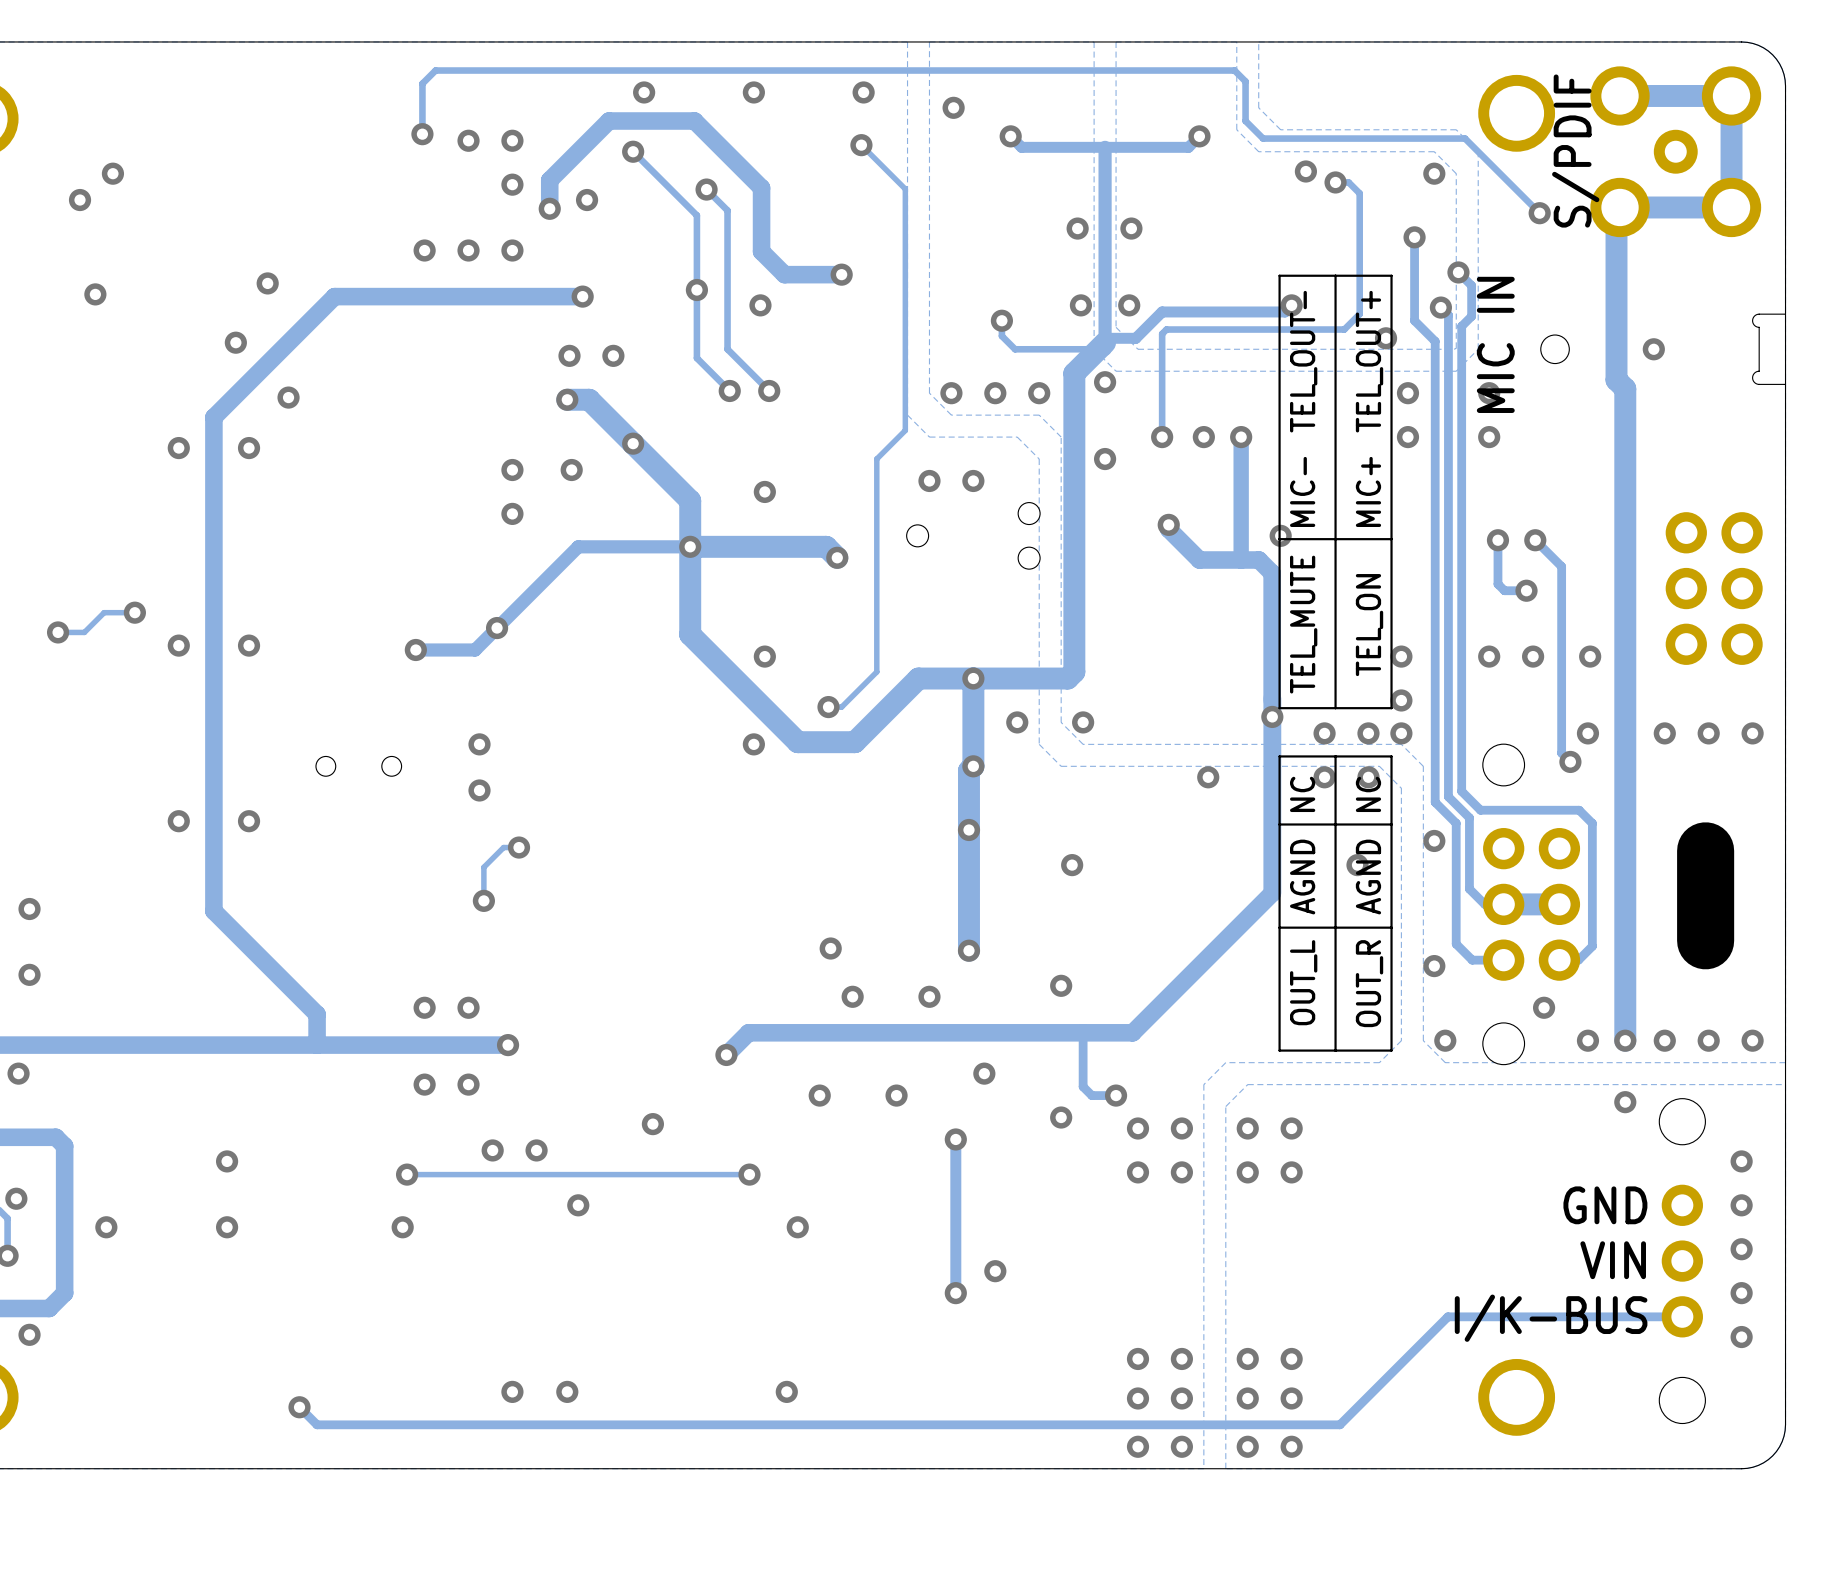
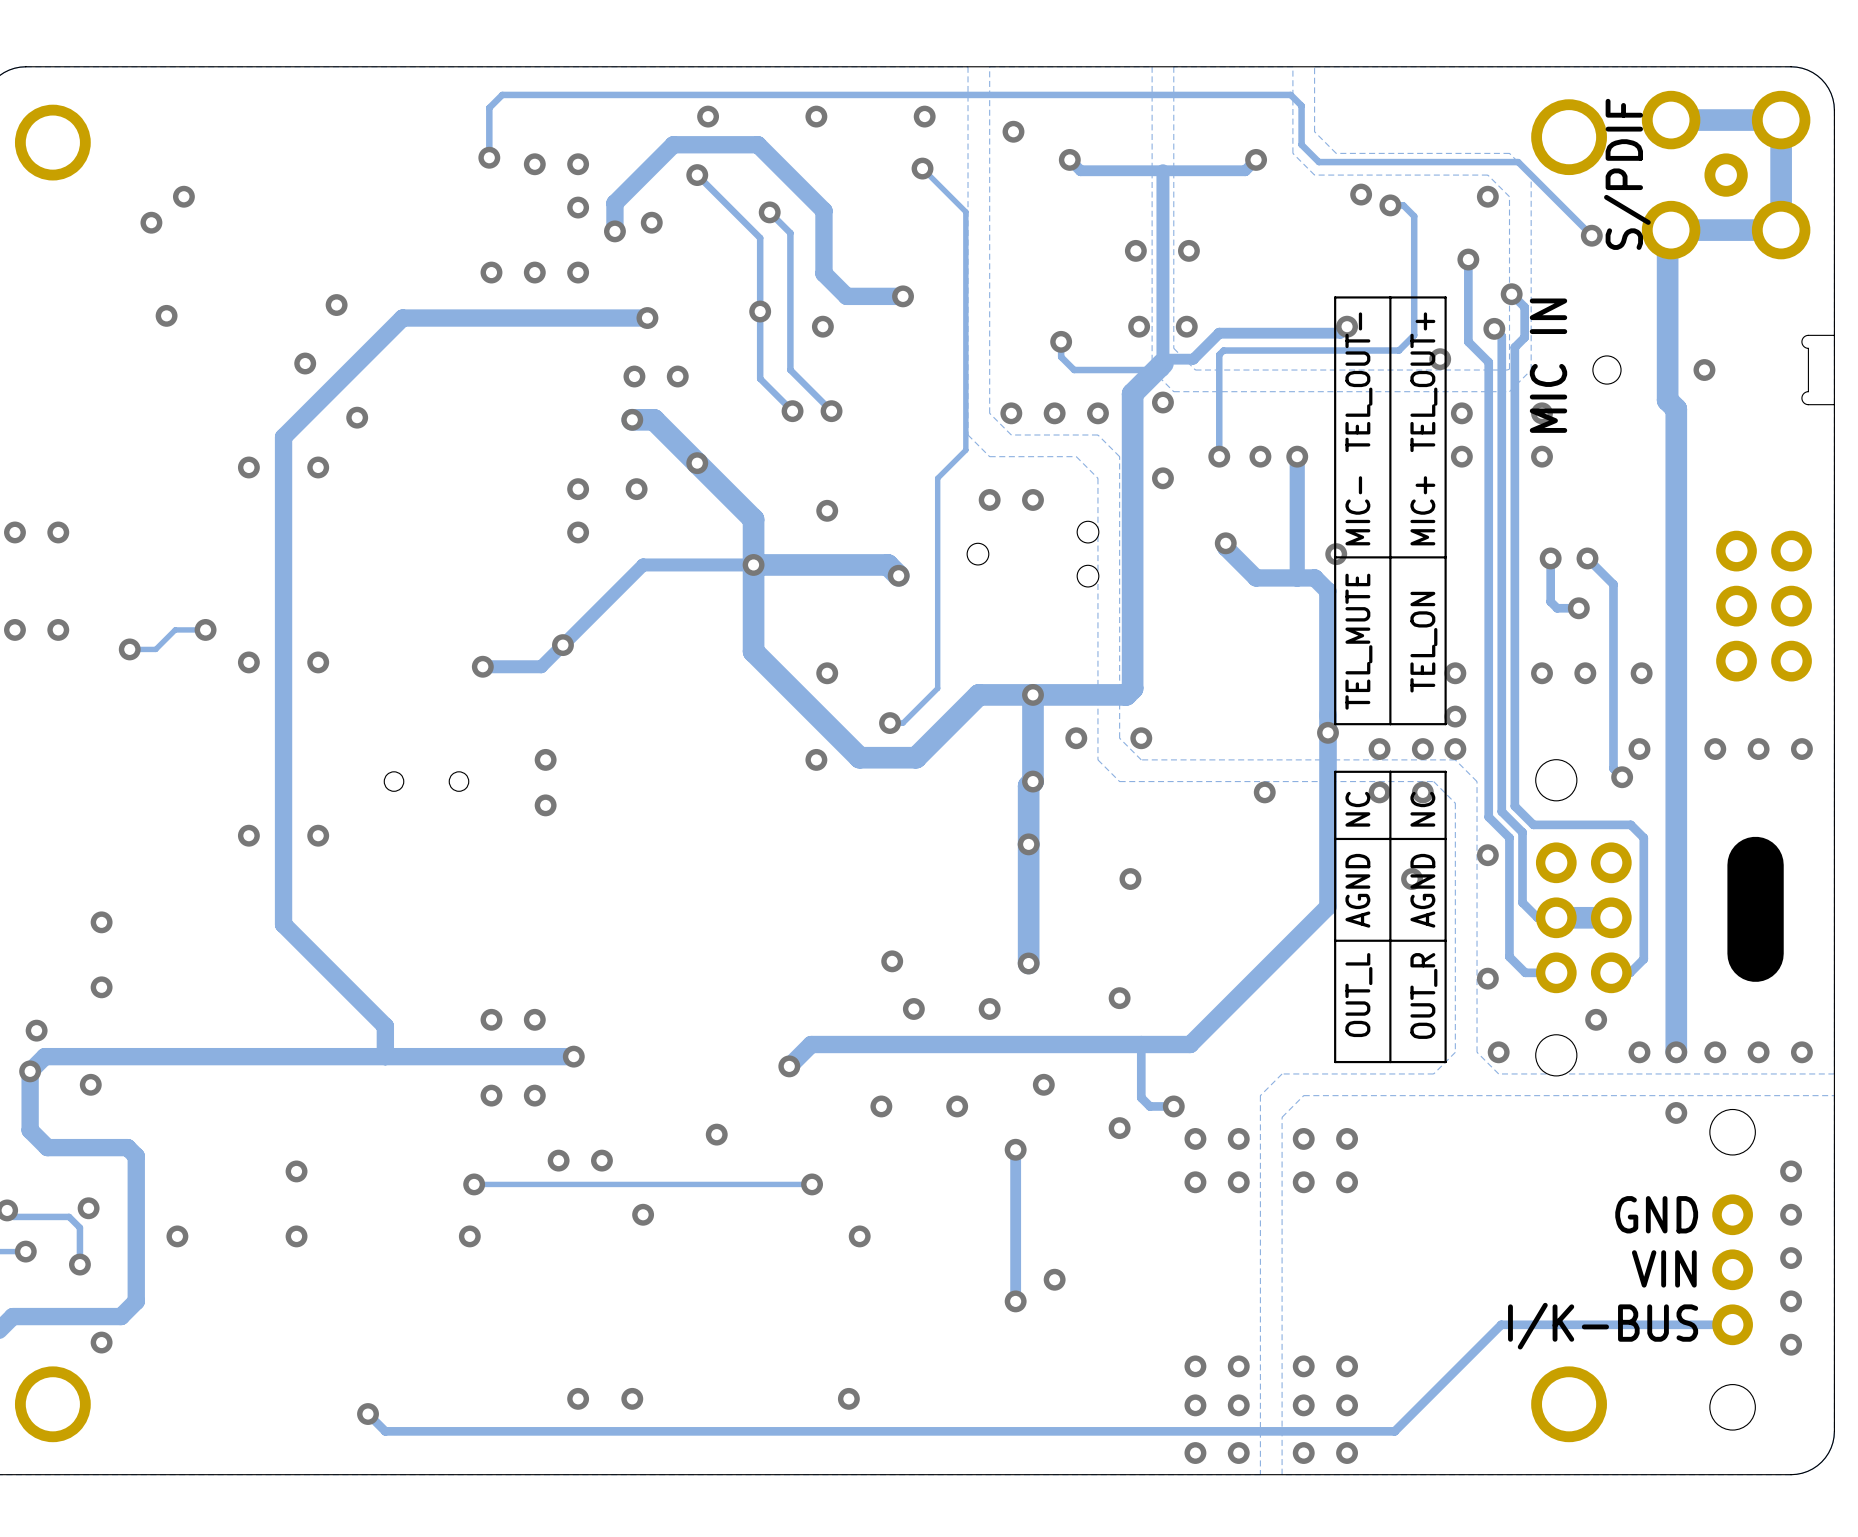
track: (519, 847) (503, 847) (483, 867) (483, 900) -> none
via: (519, 847) -> none
via: (483, 900) -> none

